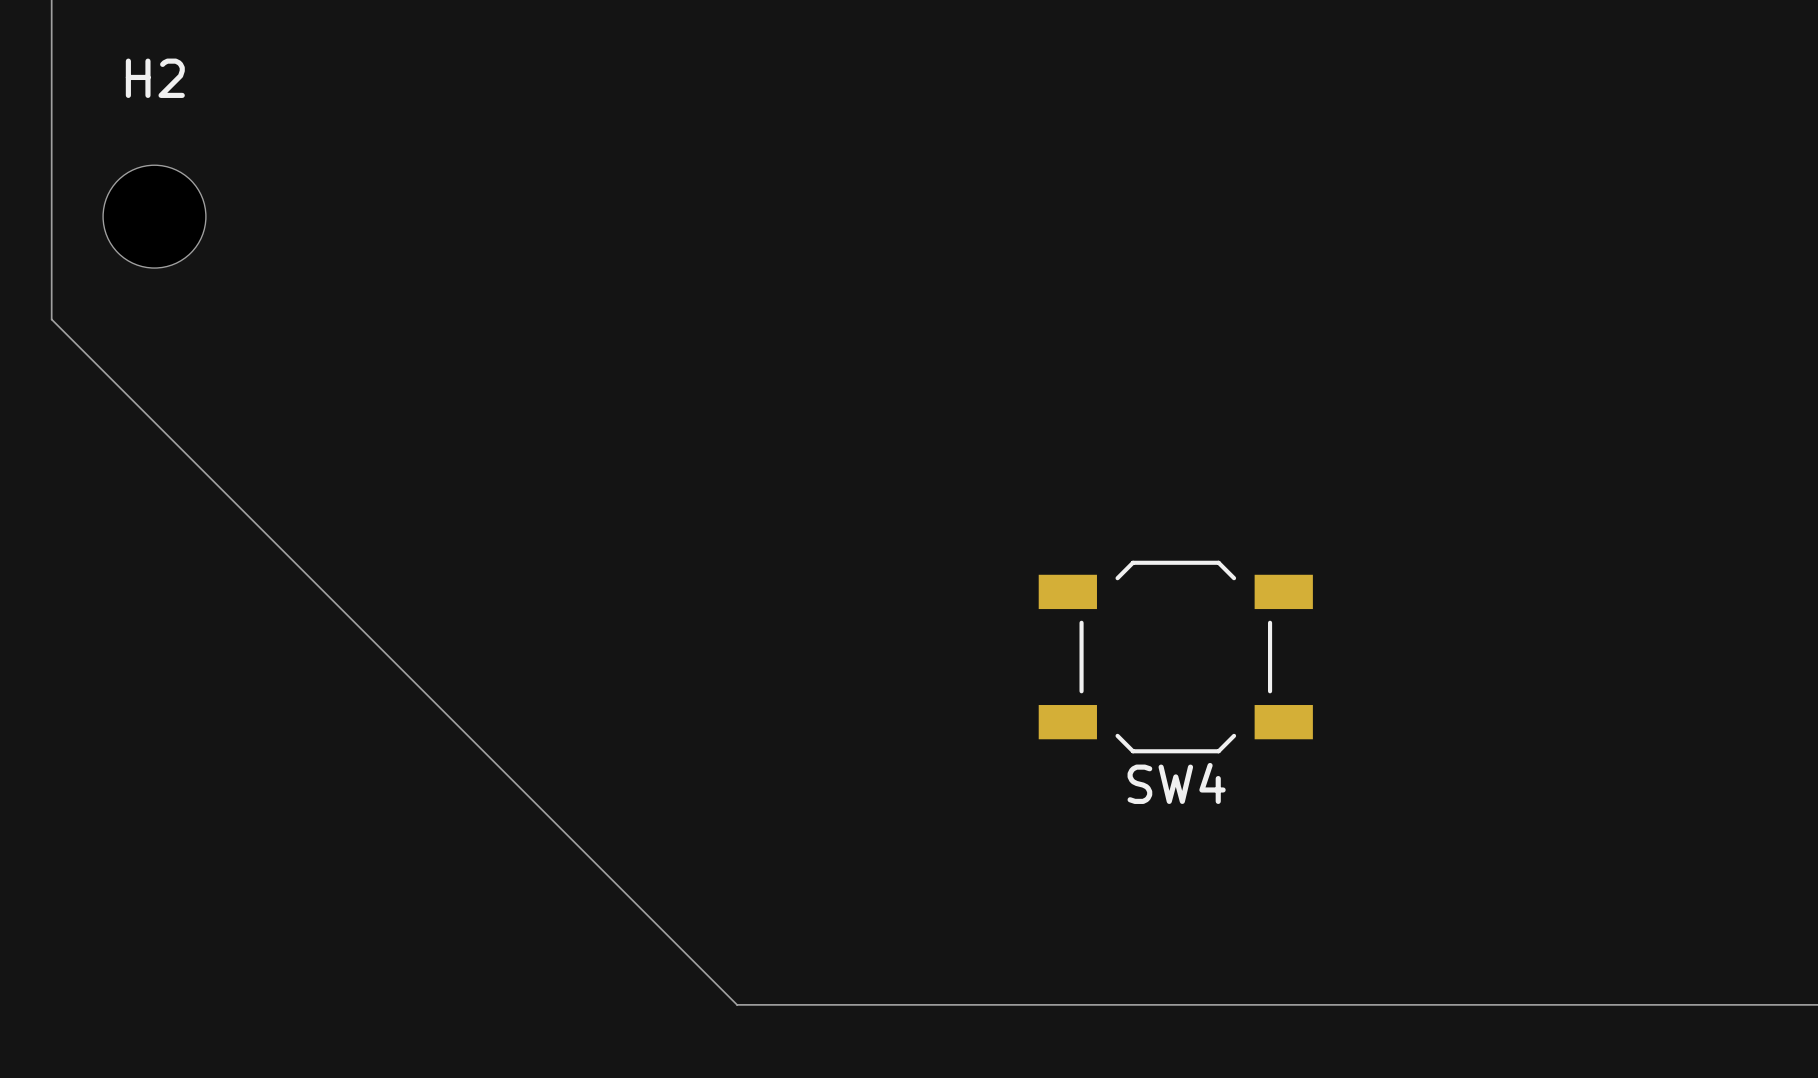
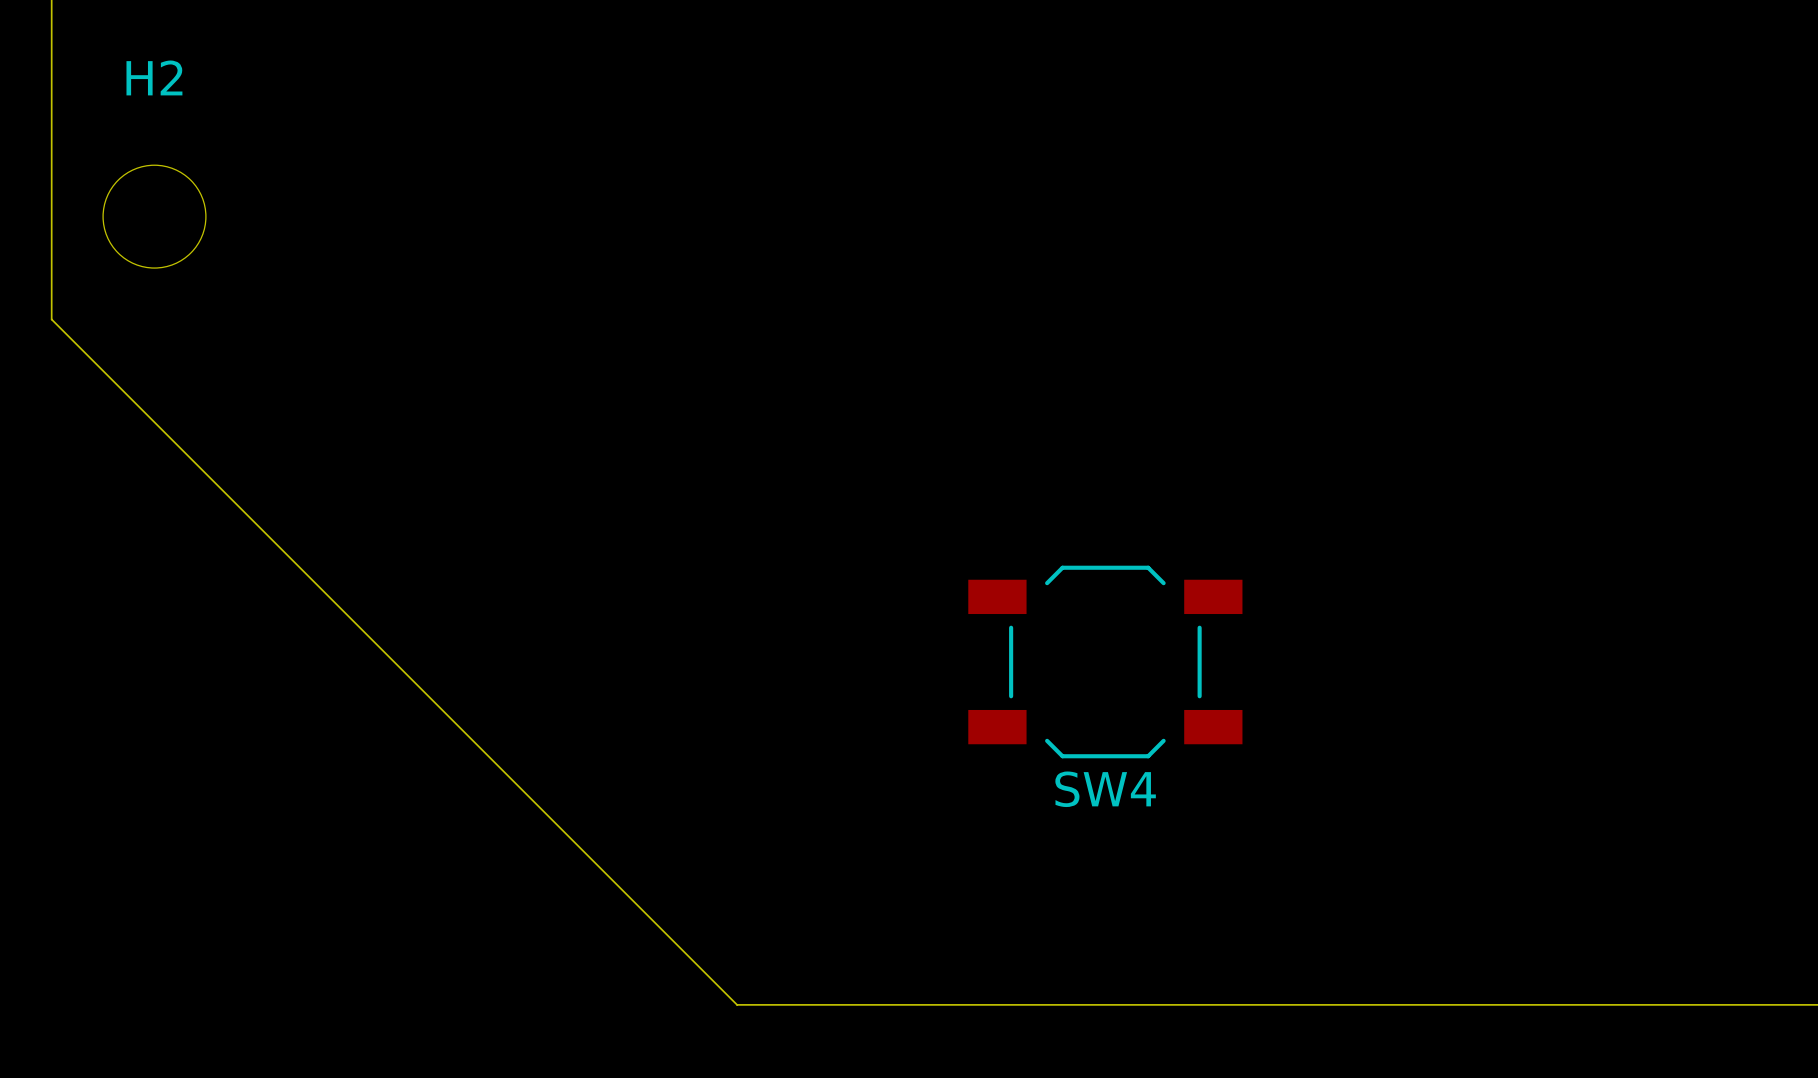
SW4 position: (1175, 657) -> (1105, 662)

